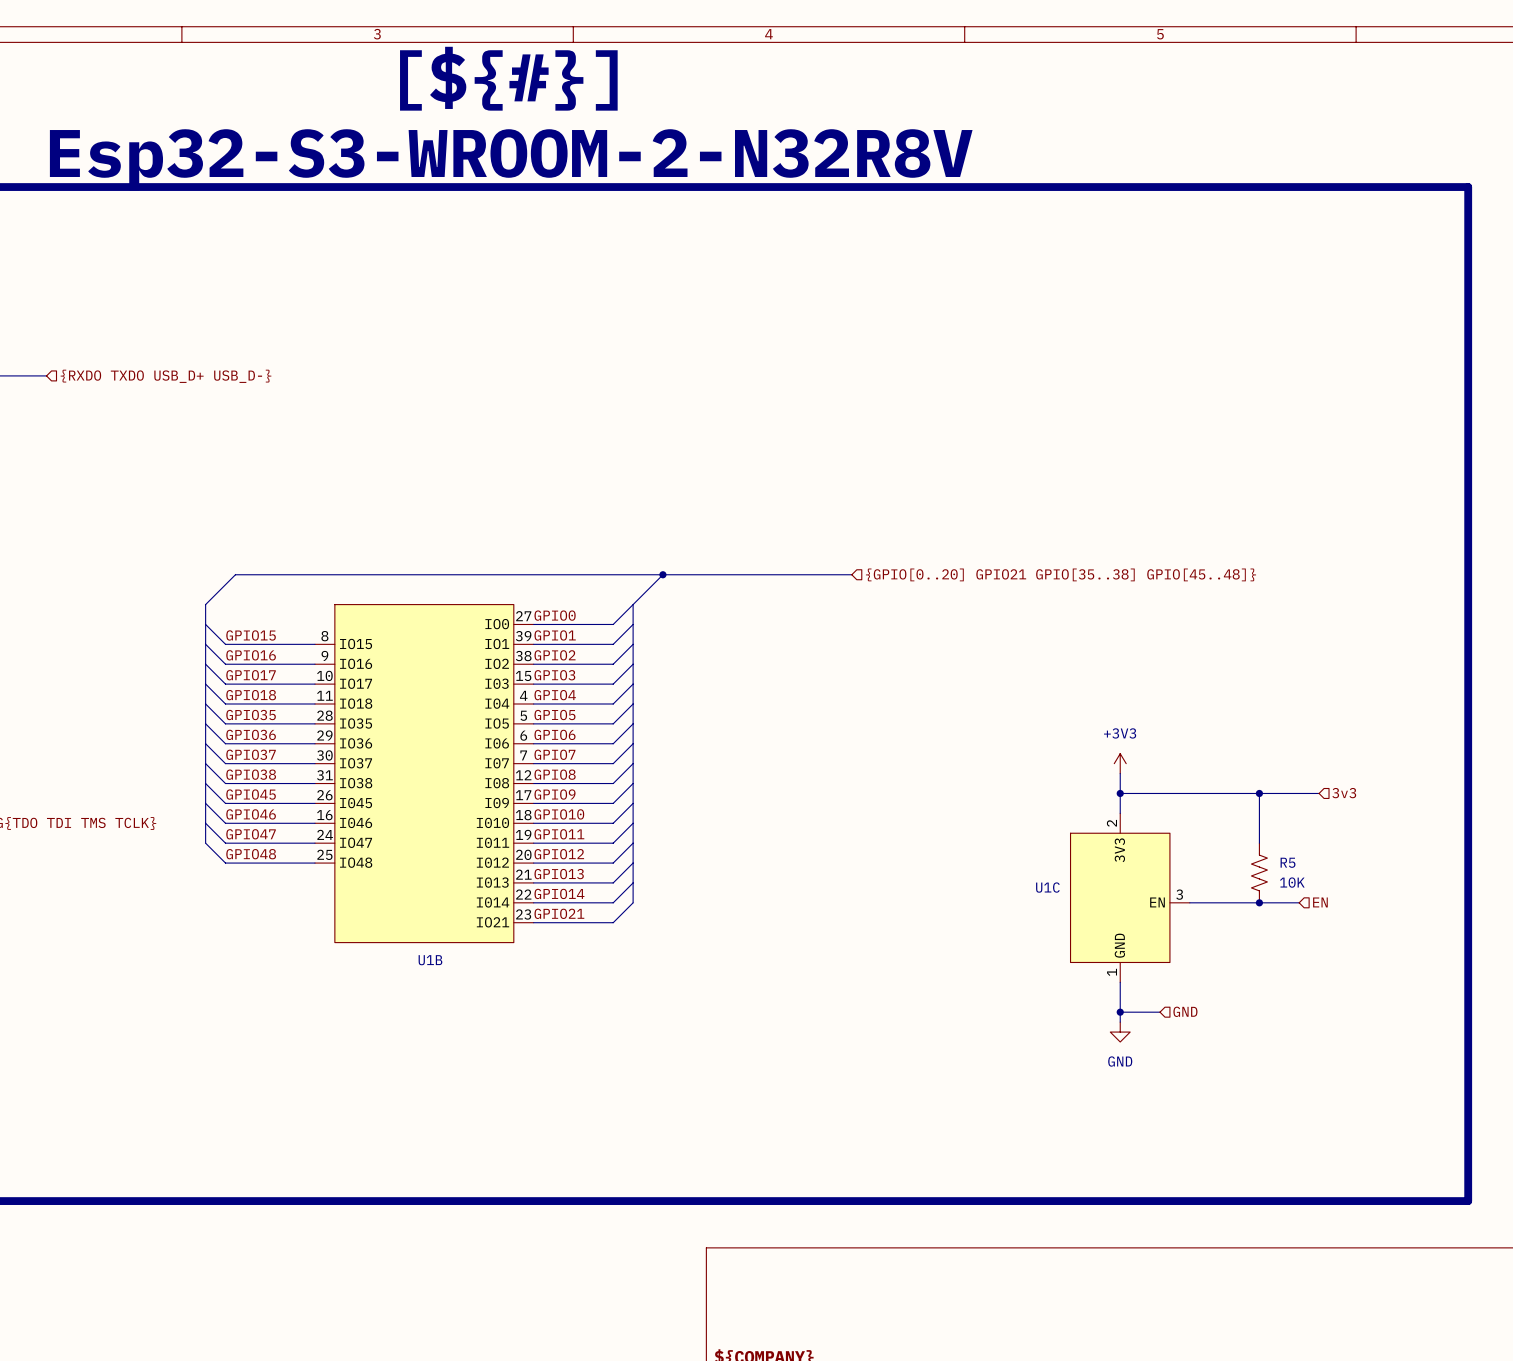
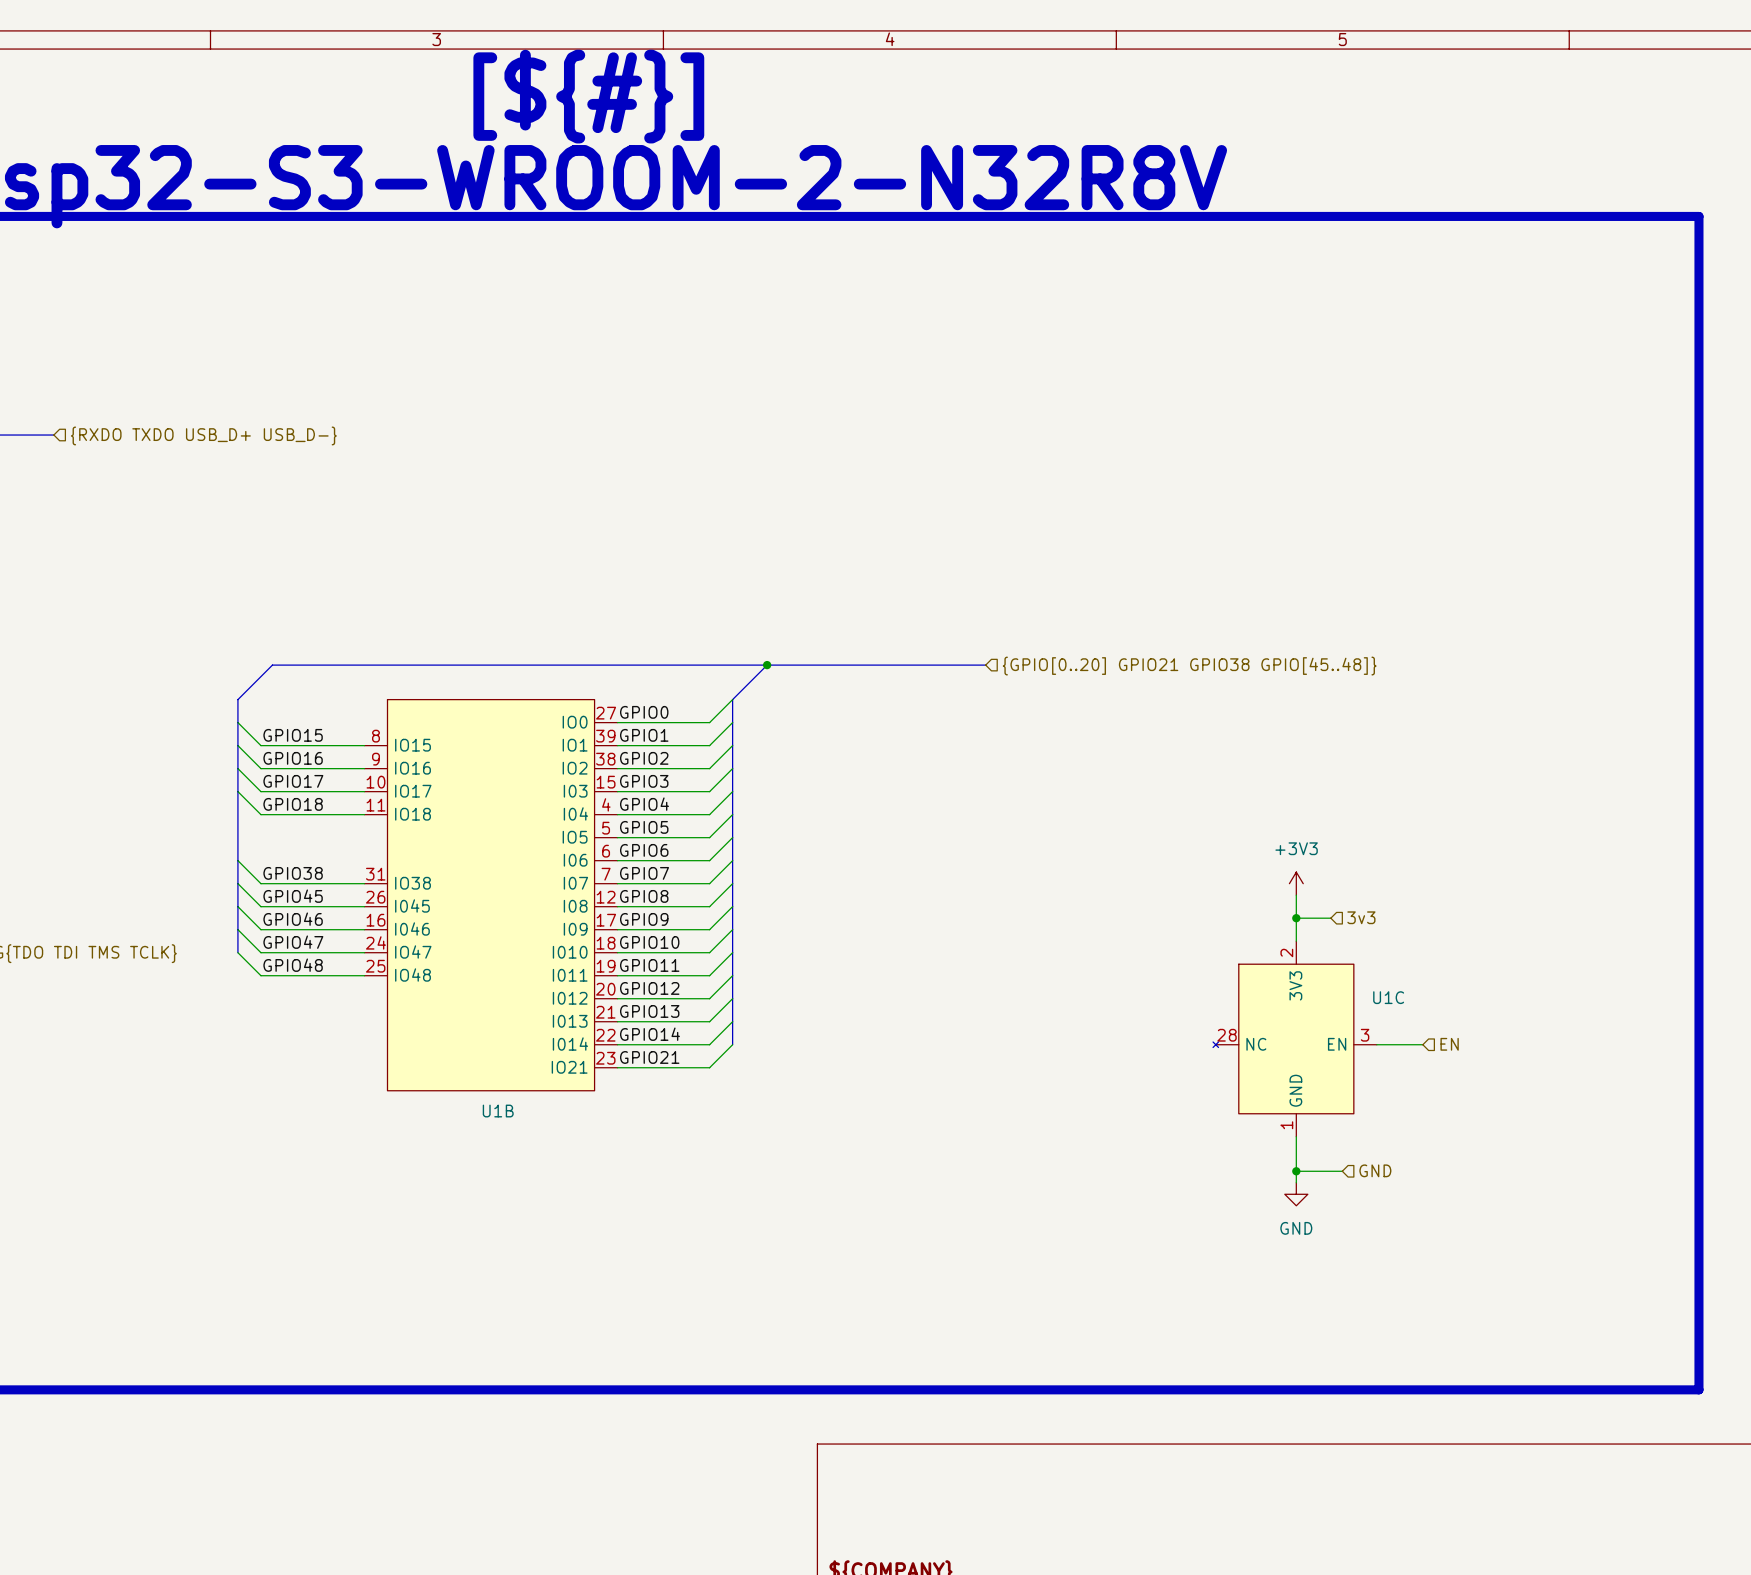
hierarchical label: {GPIO[0..20] GPIO21 GPIO[35..38] GPIO[45..48]} (1061, 574) -> {GPIO[0..20] GPIO21 GPIO38 GPIO[45..48]} (1189, 666)
U1B symbol: [314, 604, 534, 943] -> [364, 699, 618, 1091]
wire: (205, 703) (225, 723) (314, 723) -> none
label: GPIO35 (251, 715) -> none
wire: (205, 723) (225, 743) (314, 743) -> none
label: GPIO36 (251, 734) -> none
label: GPIO37 (251, 754) -> GPIO38 (293, 873)
label: GPIO38 (251, 774) -> GPIO45 (293, 896)
wire: (1150, 793) (1319, 793) -> none
wire: (1259, 793) (1259, 843) -> none
junction: (1259, 793) -> none
hierarchical label position: 3v3 (1344, 793) -> 3v3 (1361, 917)
label: GPIO45 (251, 794) -> GPIO46 (293, 919)
U1C symbol: [1070, 813, 1190, 983] -> [1213, 941, 1377, 1137]
label: GPIO46 (251, 814) -> GPIO47 (293, 942)
bus: (205, 823) (205, 843) -> none
label: GPIO47 (251, 834) -> GPIO48 (293, 965)
wire: (205, 843) (225, 863) (314, 863) -> none
label: GPIO48 (251, 854) -> none
R5: 10K (1259, 873) -> none
U1C name position: U1C (1047, 887) -> U1C (1388, 997)
wire: (1229, 902) (1299, 902) -> none
junction: (1259, 902) -> none
hierarchical label position: EN (1320, 902) -> EN (1449, 1044)

